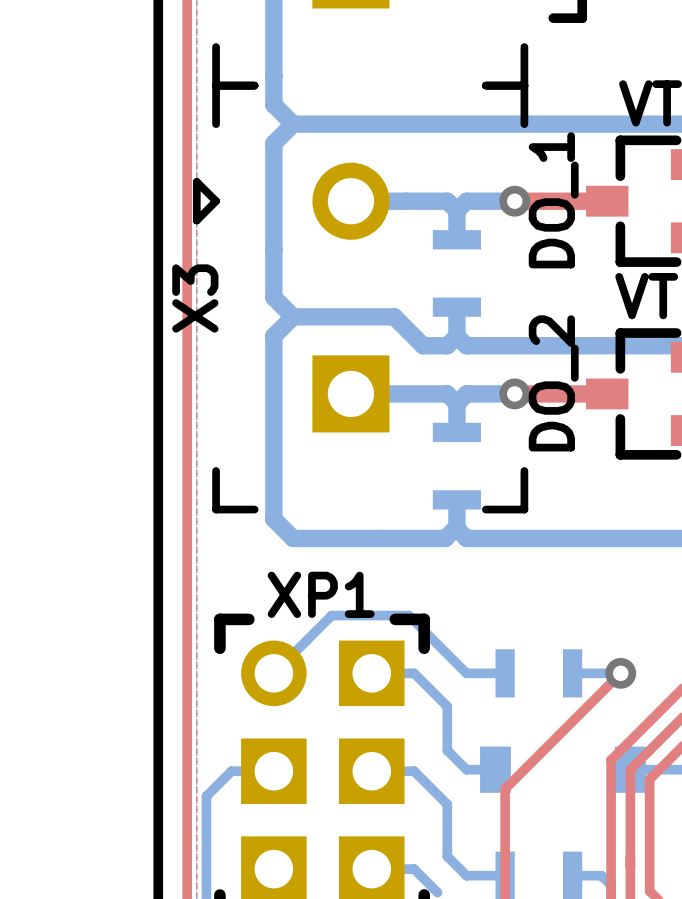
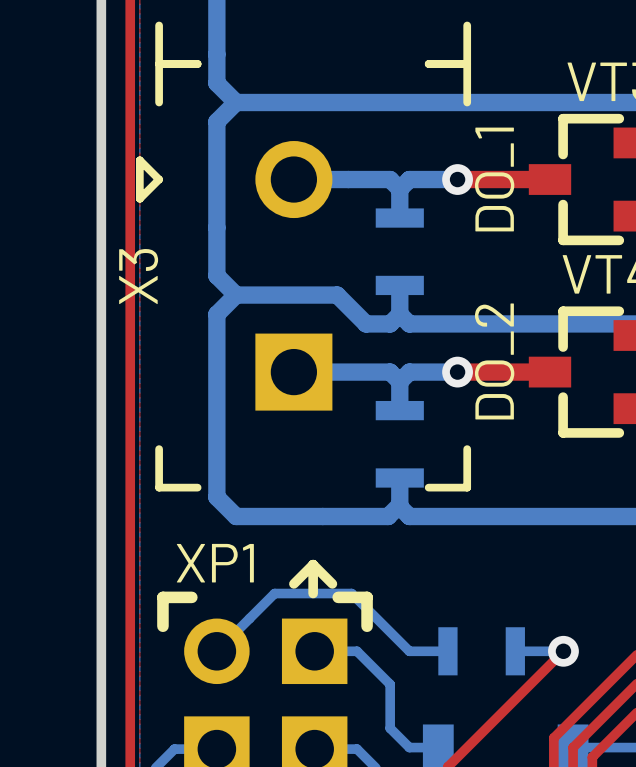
line: none -> (313, 564) (332, 583)
line: none -> (313, 564) (293, 583)
line: none -> (313, 564) (313, 593)
XP1 name position: XP1 (321, 594) -> XP1 (215, 563)

